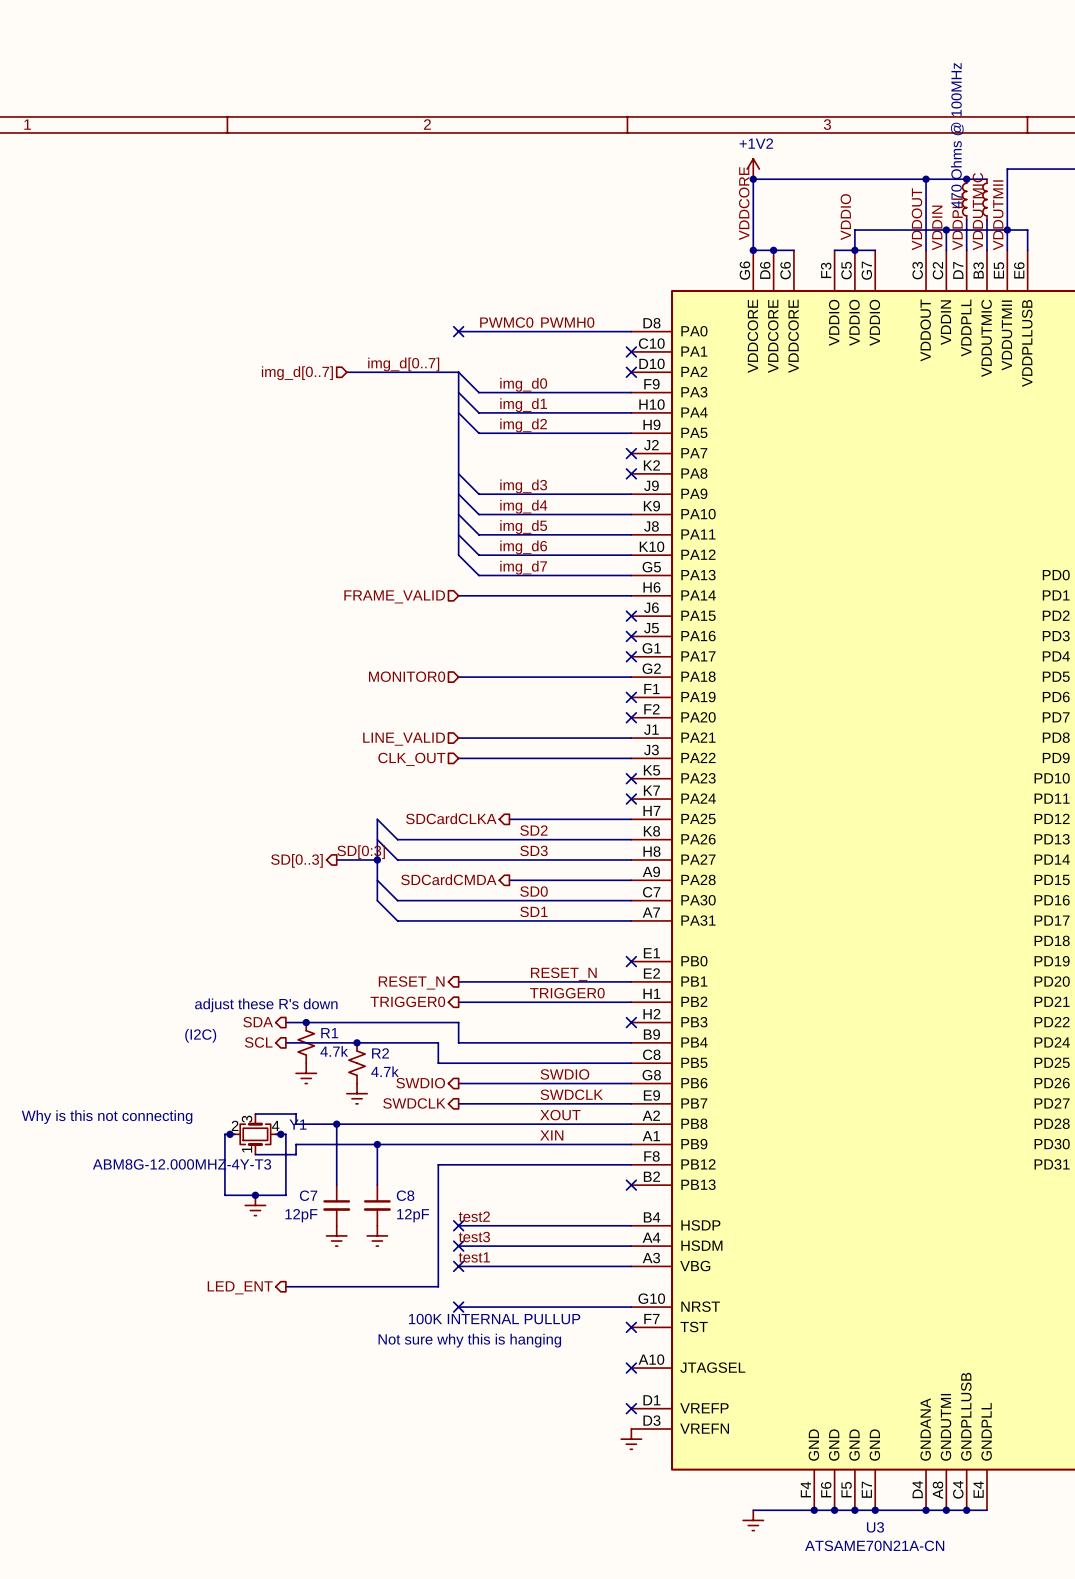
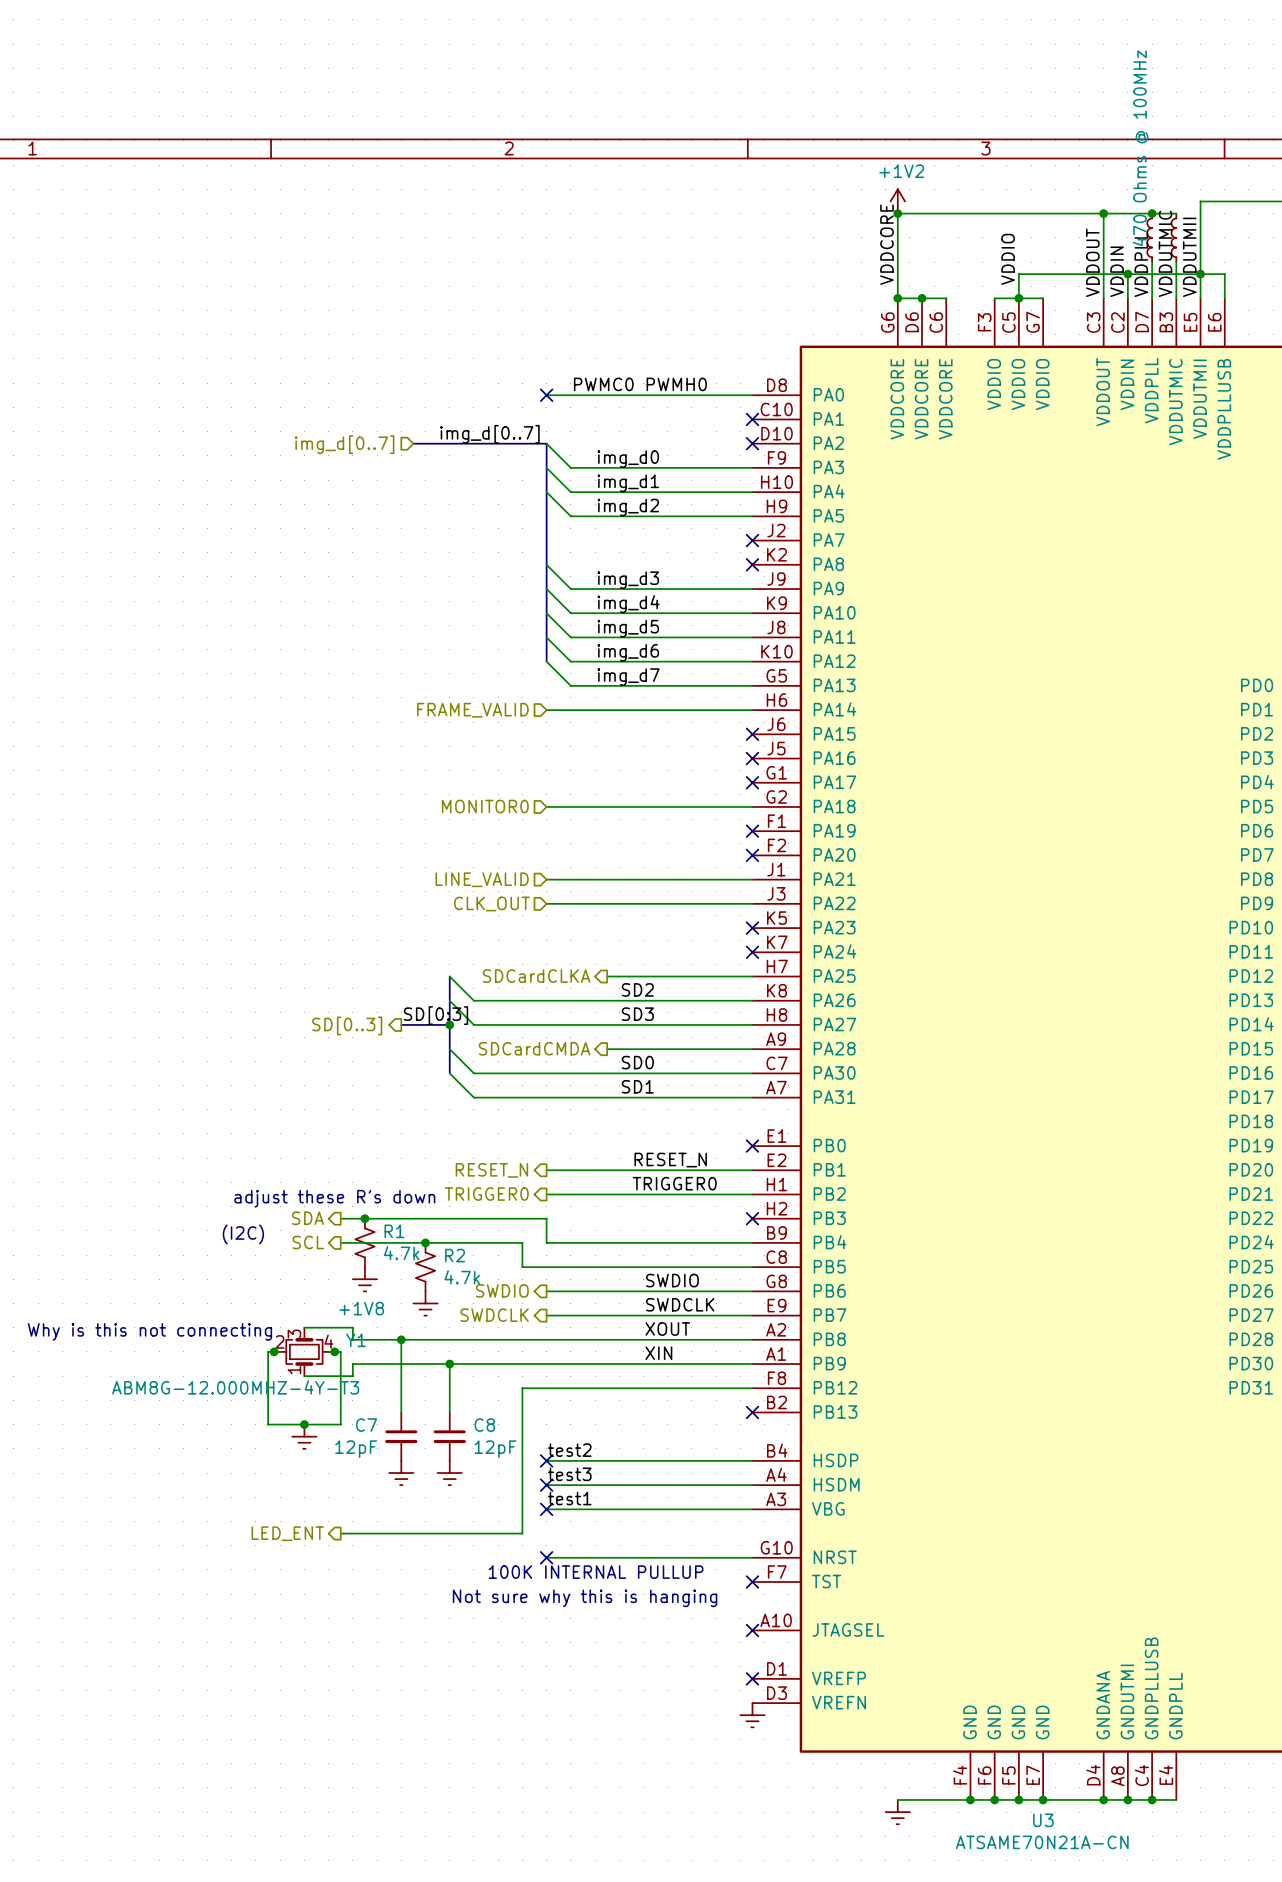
power symbol text: none -> +1V8 (361, 1308)

